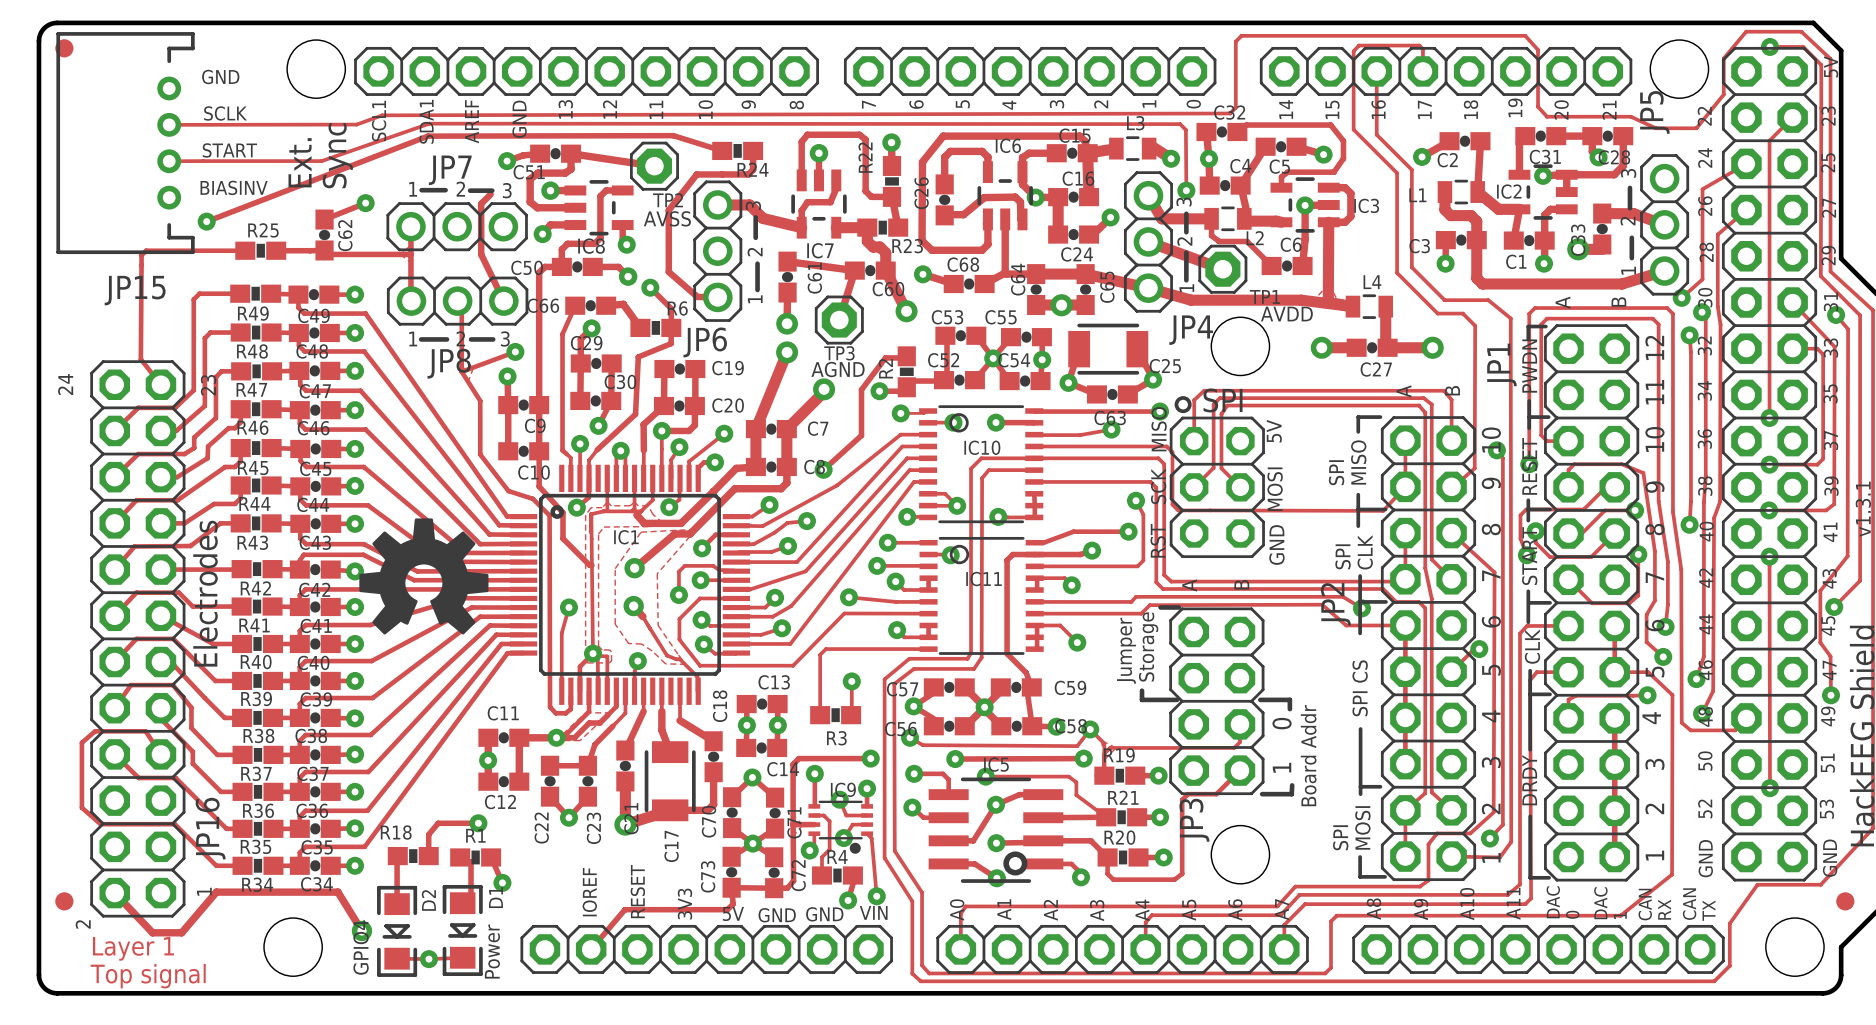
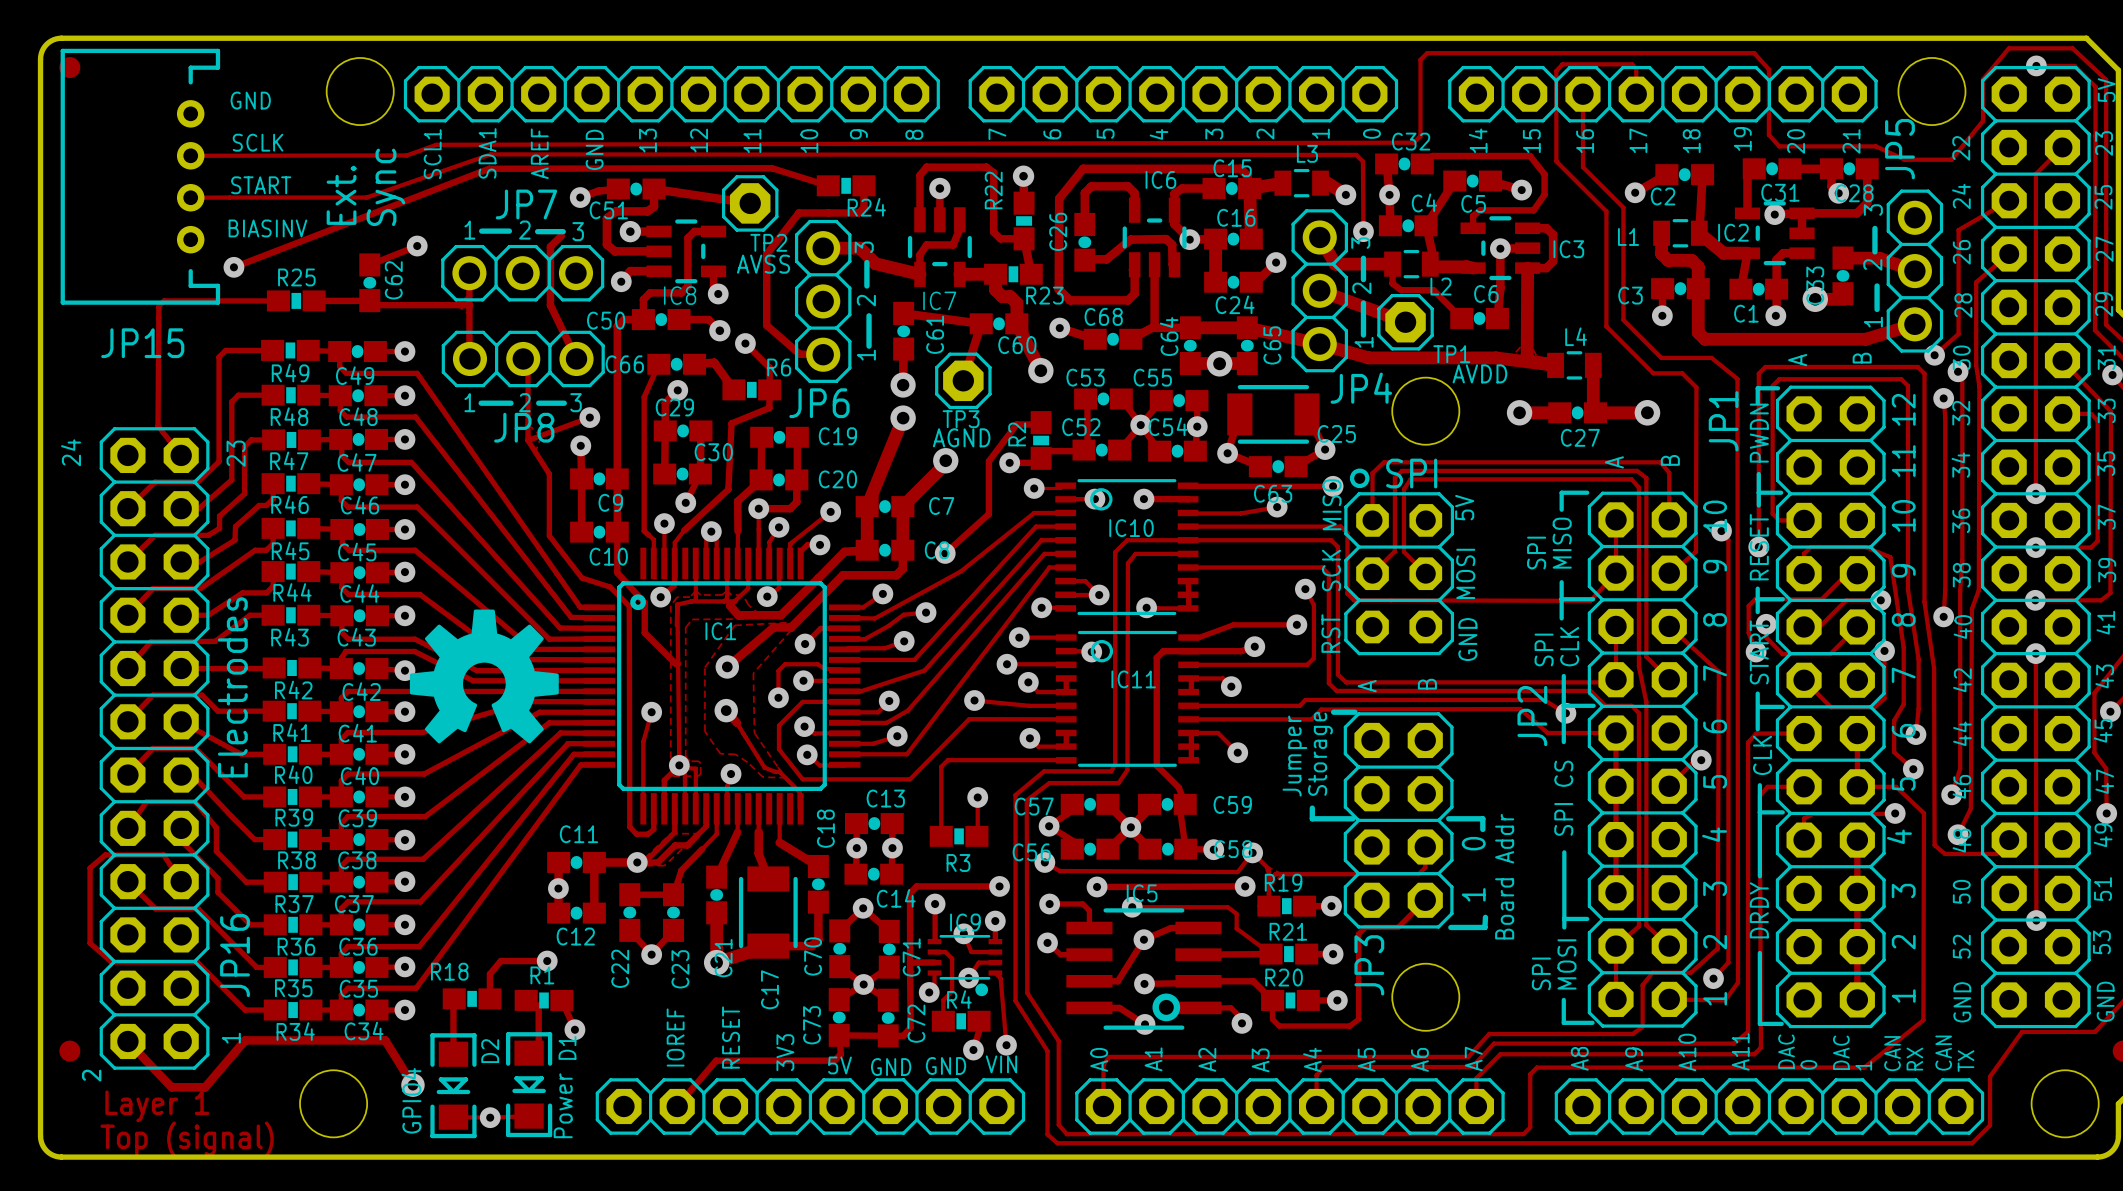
text: Top signal (148, 976) -> Top (signal) (187, 1139)

